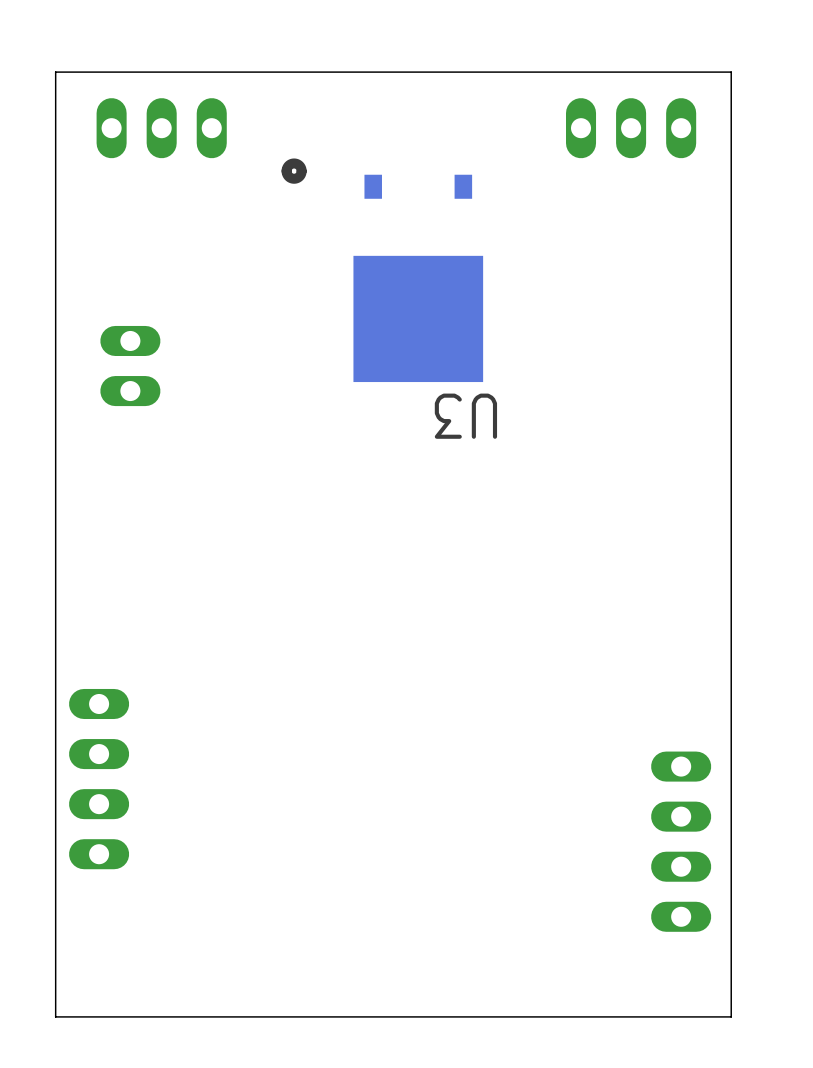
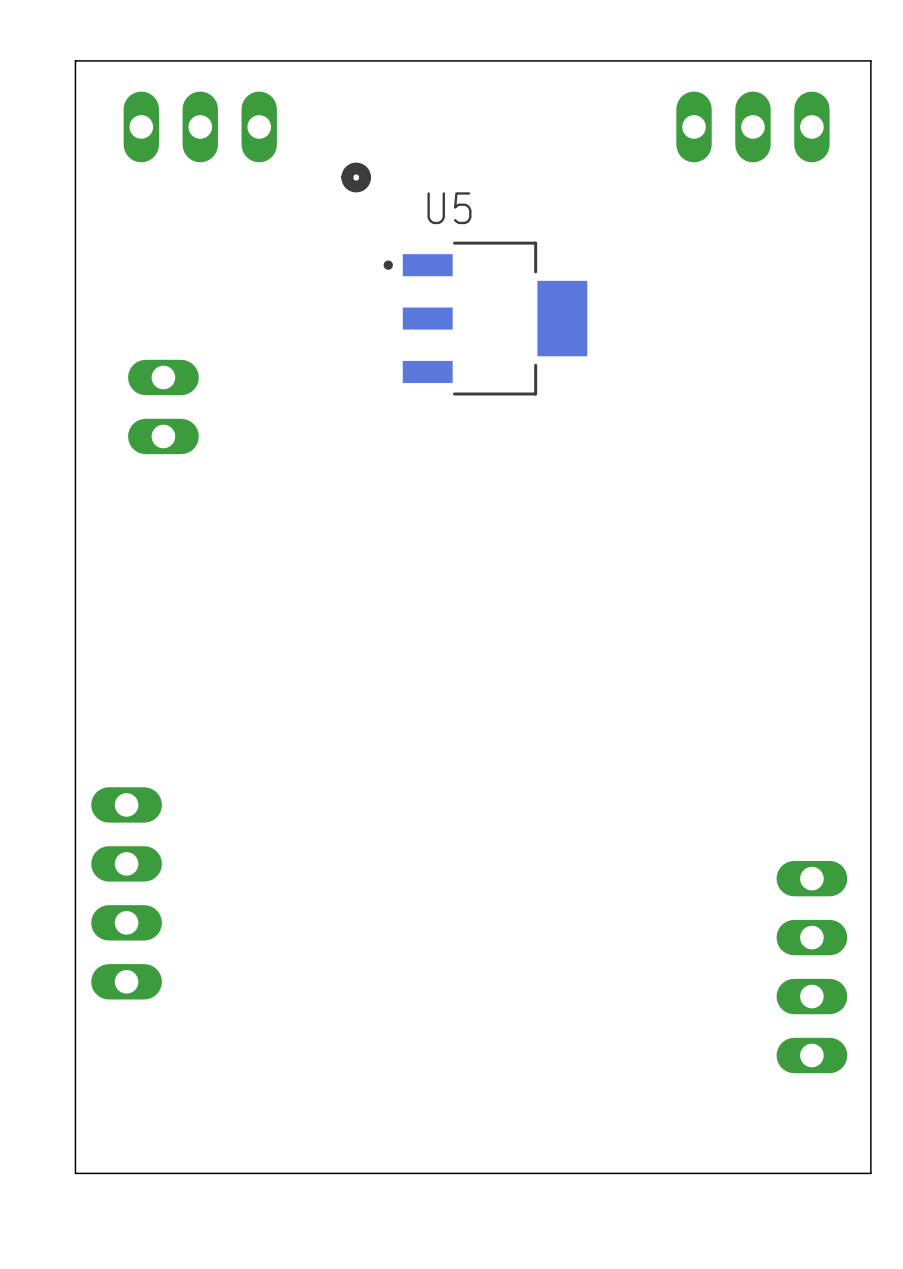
U3: (418, 278) -> none
U5: none -> (485, 318)

